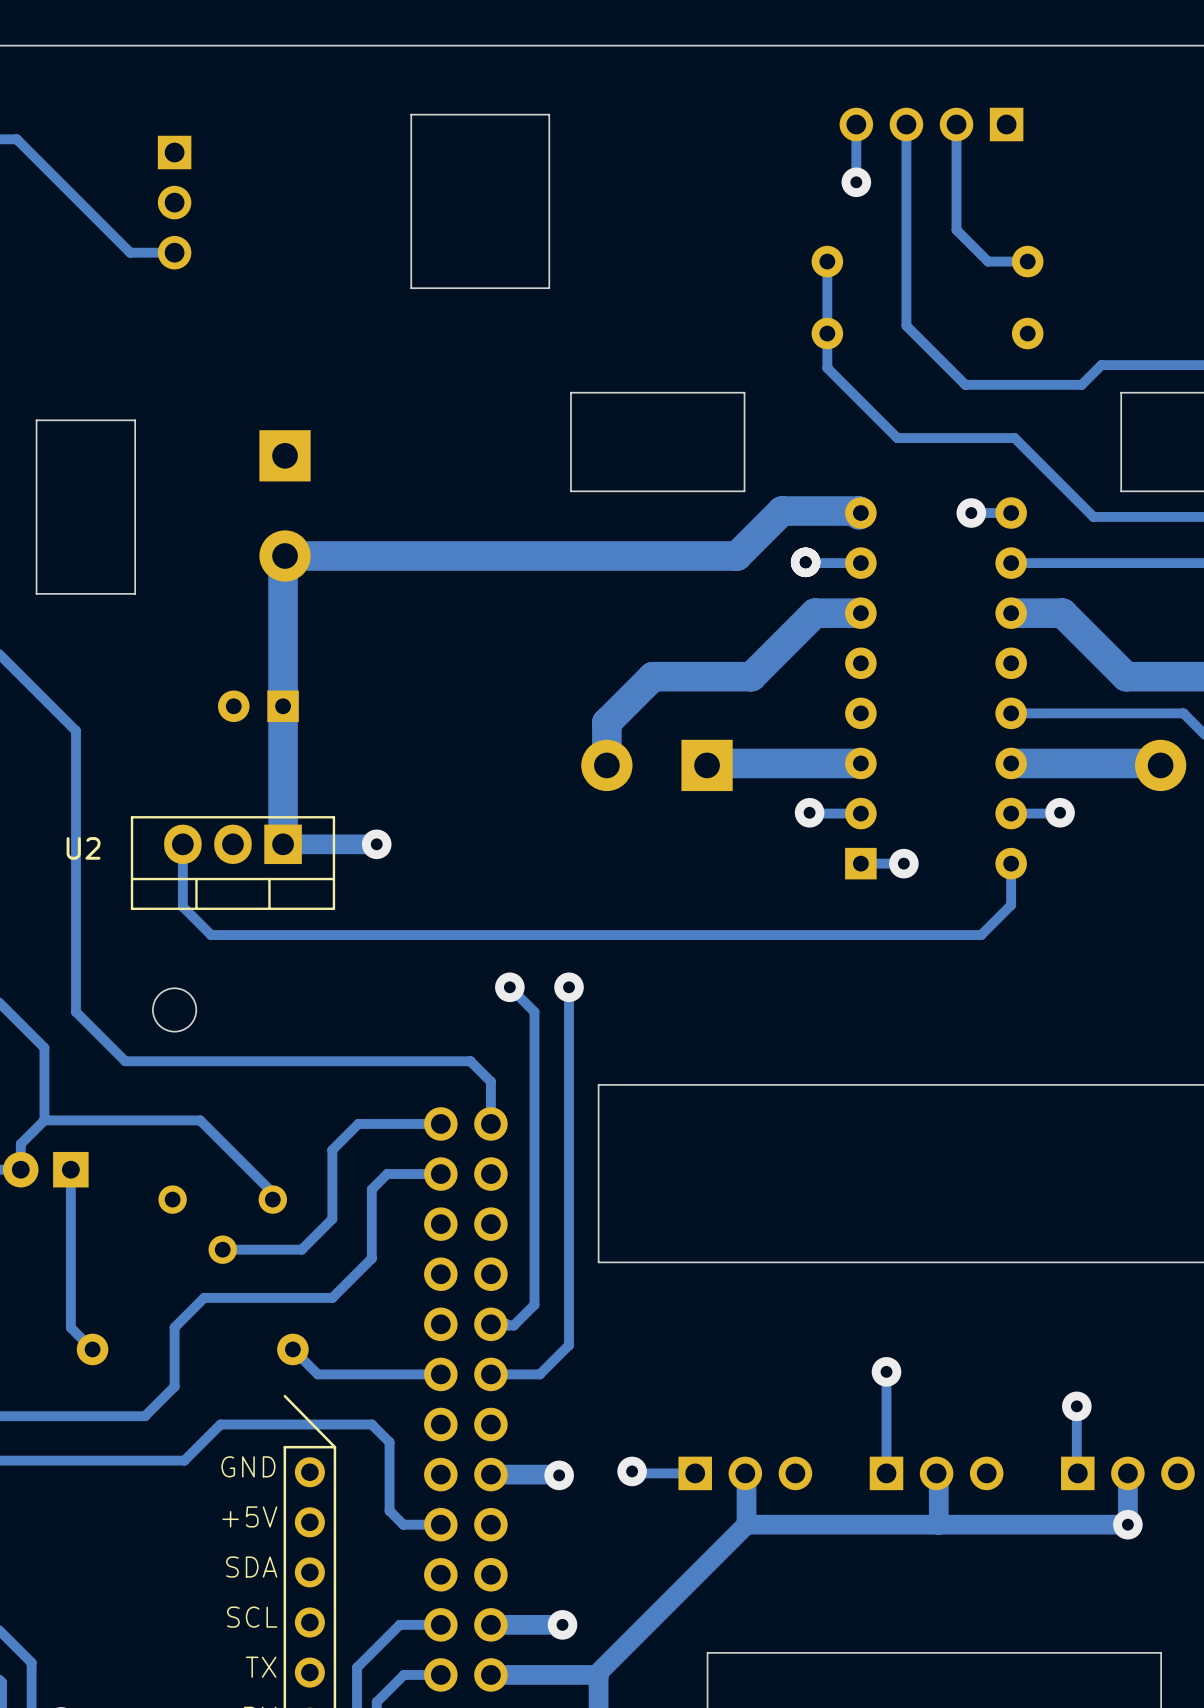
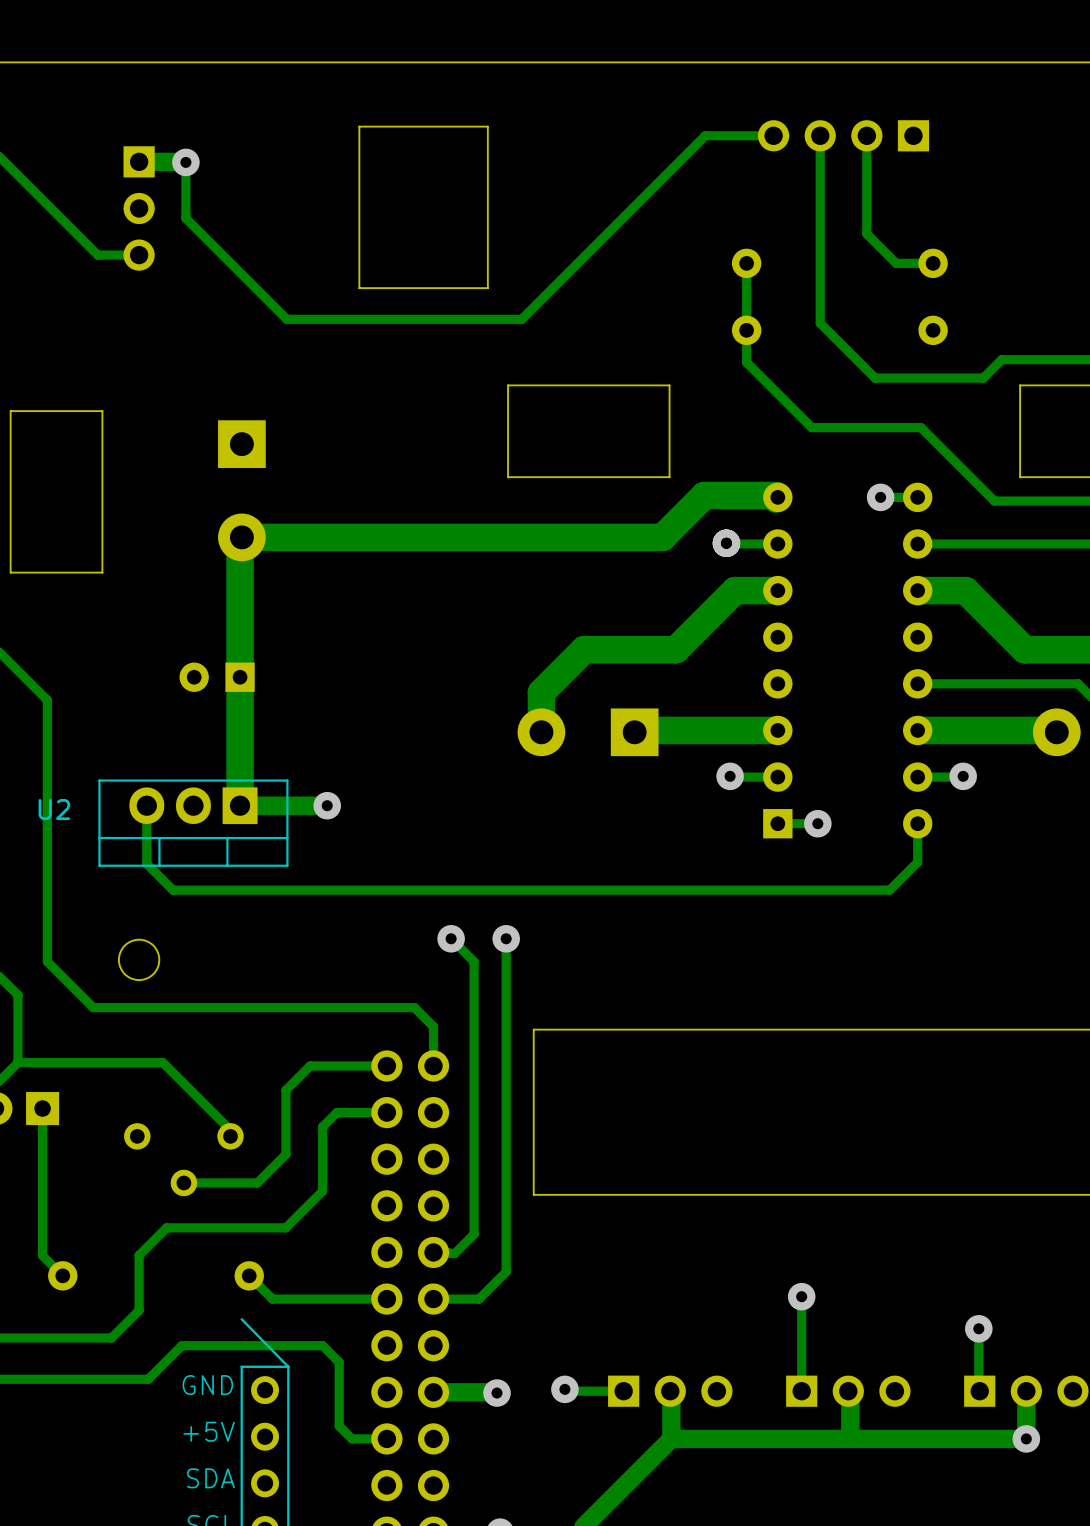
track: (856, 124) (854, 183) -> (773, 135) (705, 135) (521, 319) (286, 319) (185, 218) (185, 162) (139, 161)
via: none -> (185, 162)
via: (856, 182) -> none

